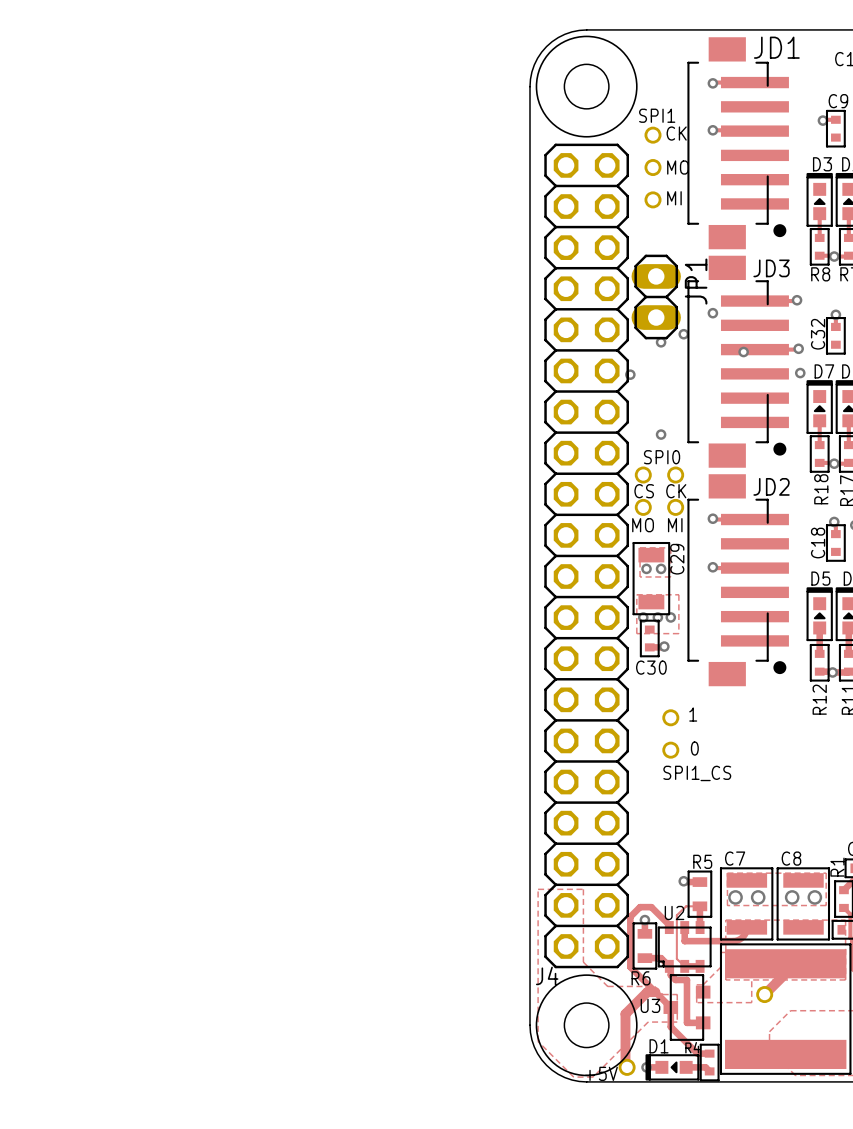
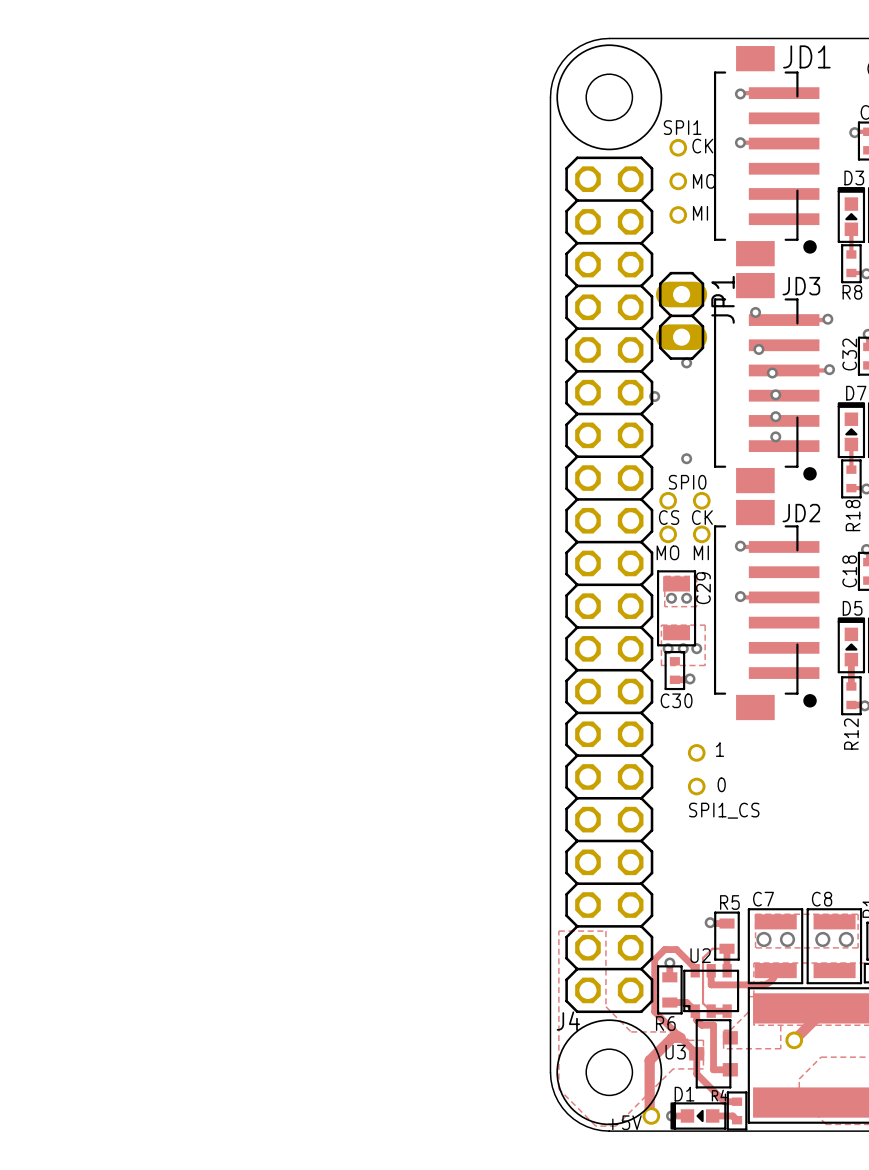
via: none -> (755, 312)
via: (712, 313) -> none
via: none -> (758, 349)
via: (683, 334) -> none
via: none -> (775, 394)
via: (800, 373) -> none
via: none -> (775, 416)
via: none -> (775, 436)

